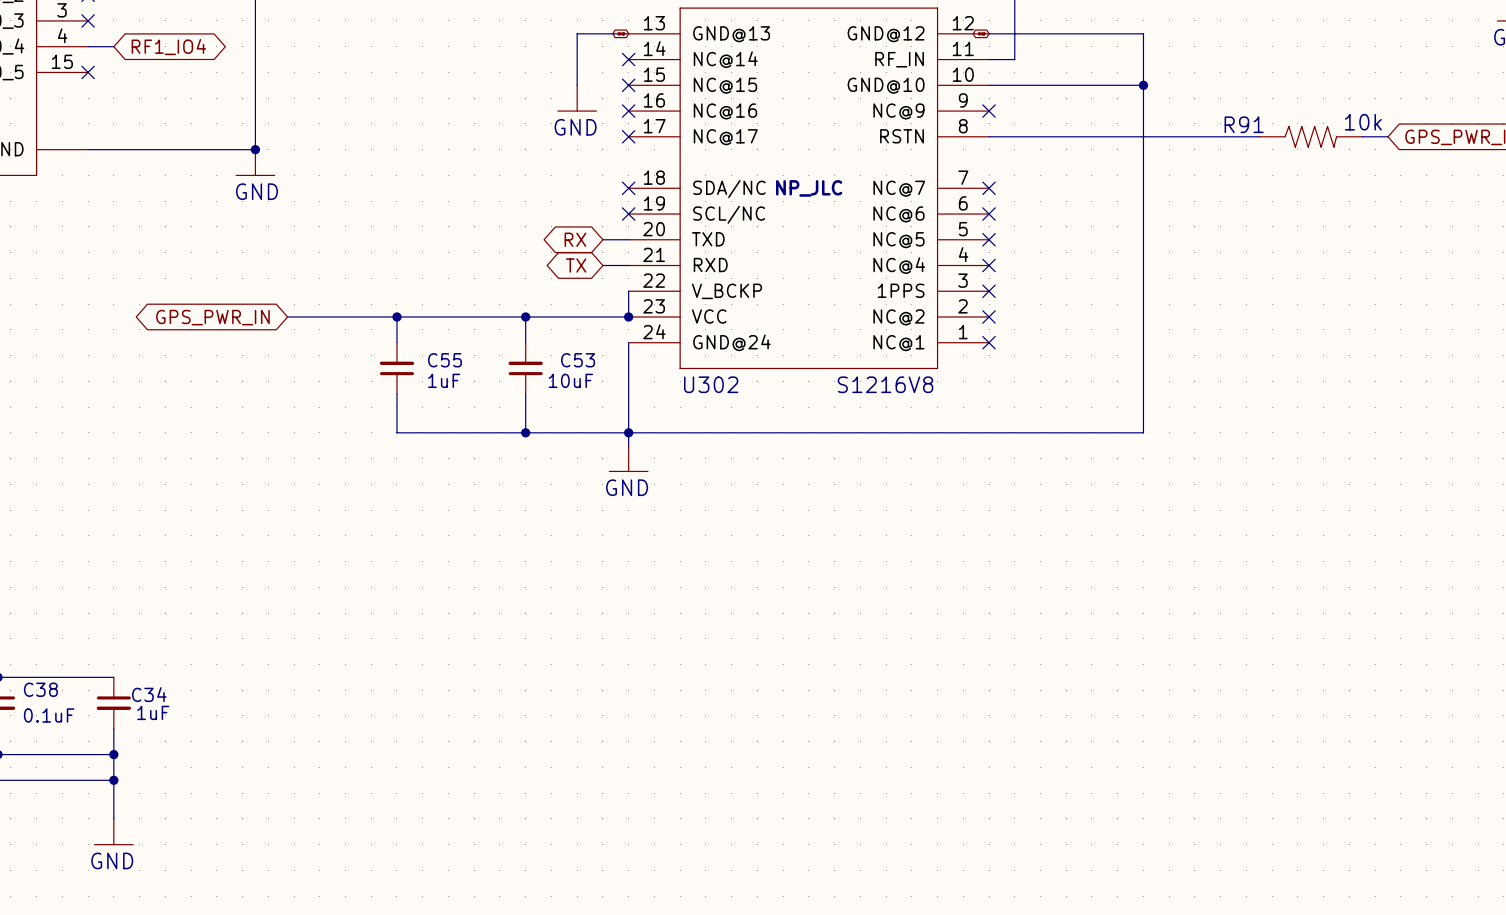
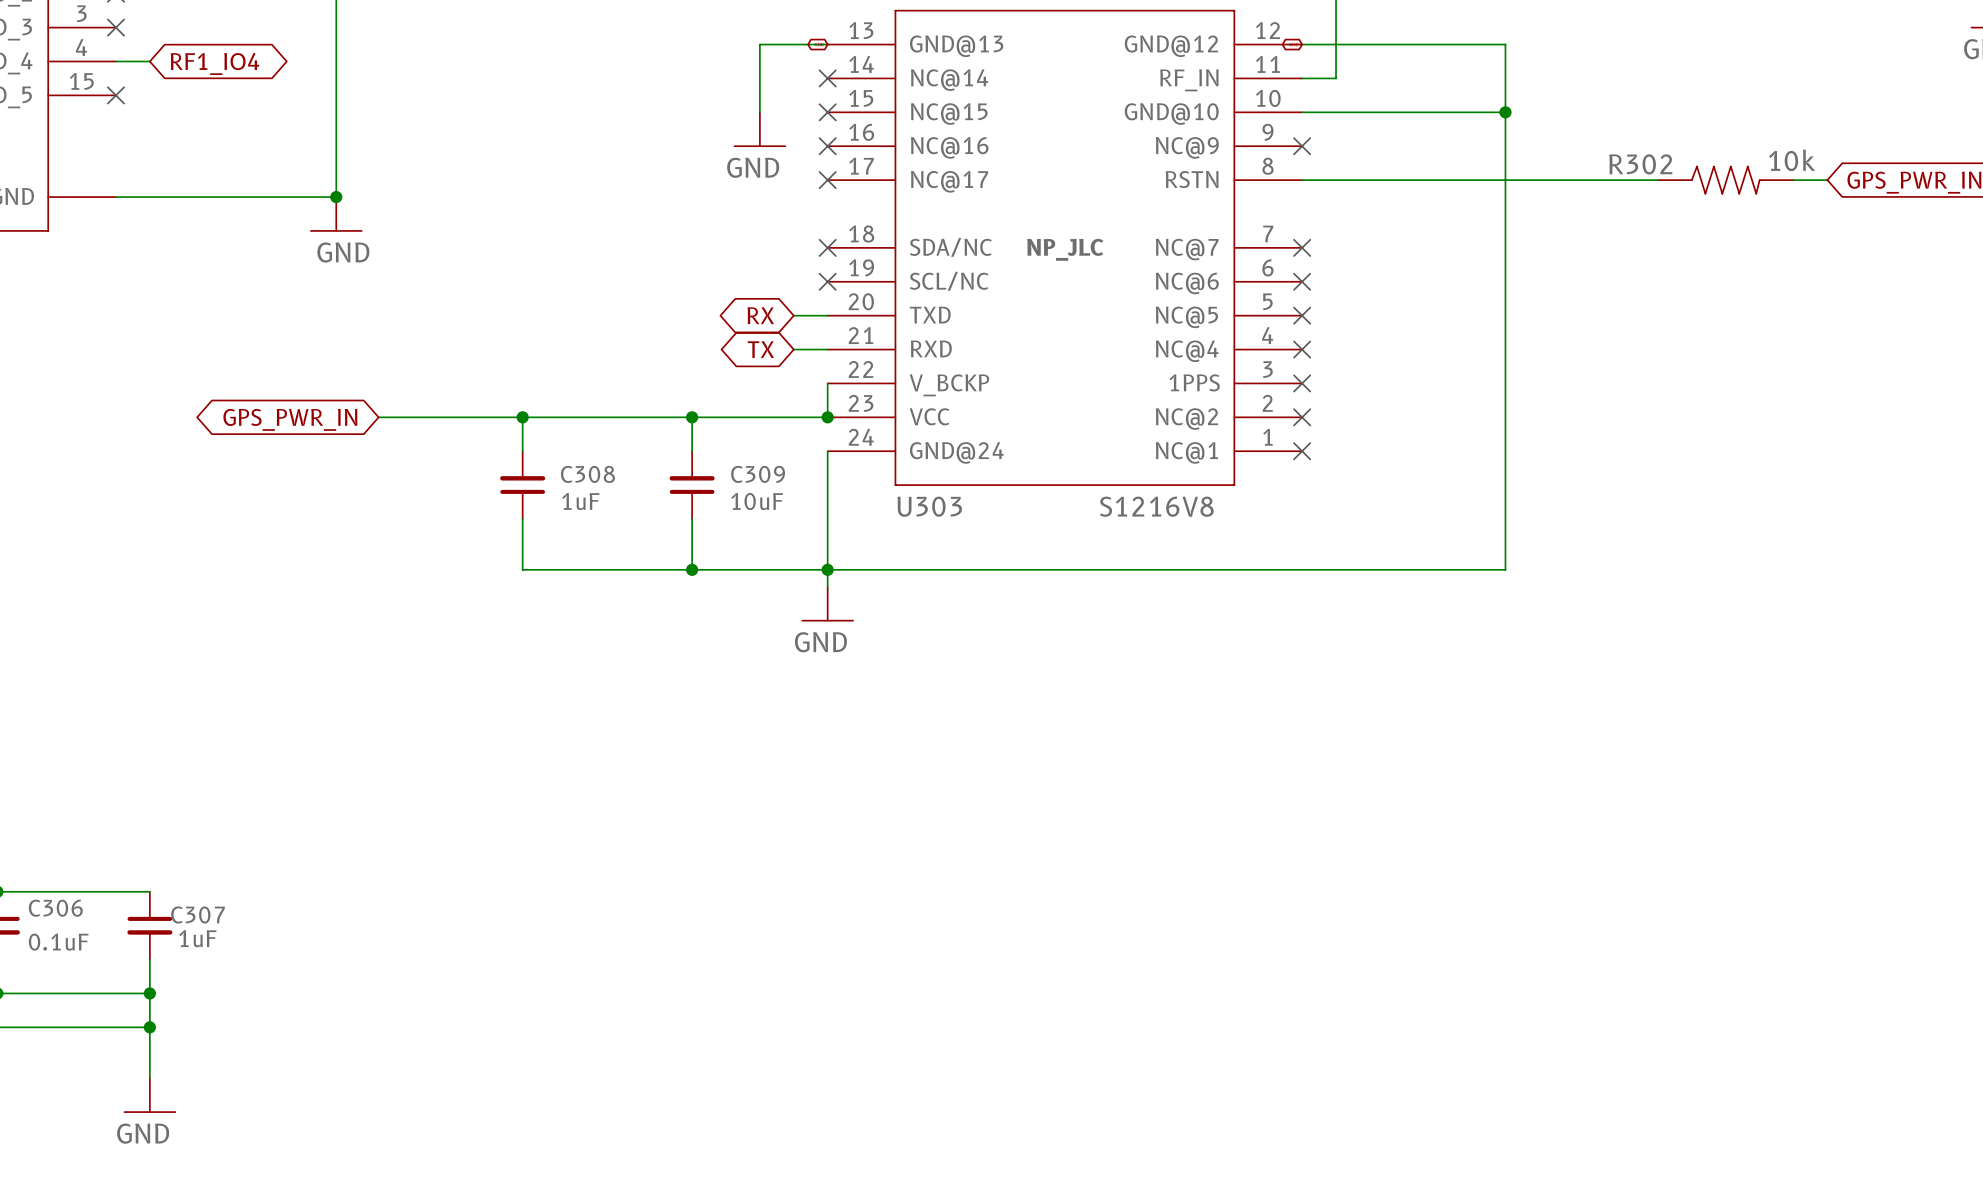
R91 name: R91 (1244, 124) -> R302 (1640, 164)
C55 name: C55 (445, 360) -> C308 (587, 474)
C53 name: C53 (578, 360) -> C309 (758, 474)
U302 name: U302 (711, 384) -> U303 (929, 506)
C38 name: C38 (40, 689) -> C306 (55, 908)
C34 name: C34 (149, 694) -> C307 (198, 914)

